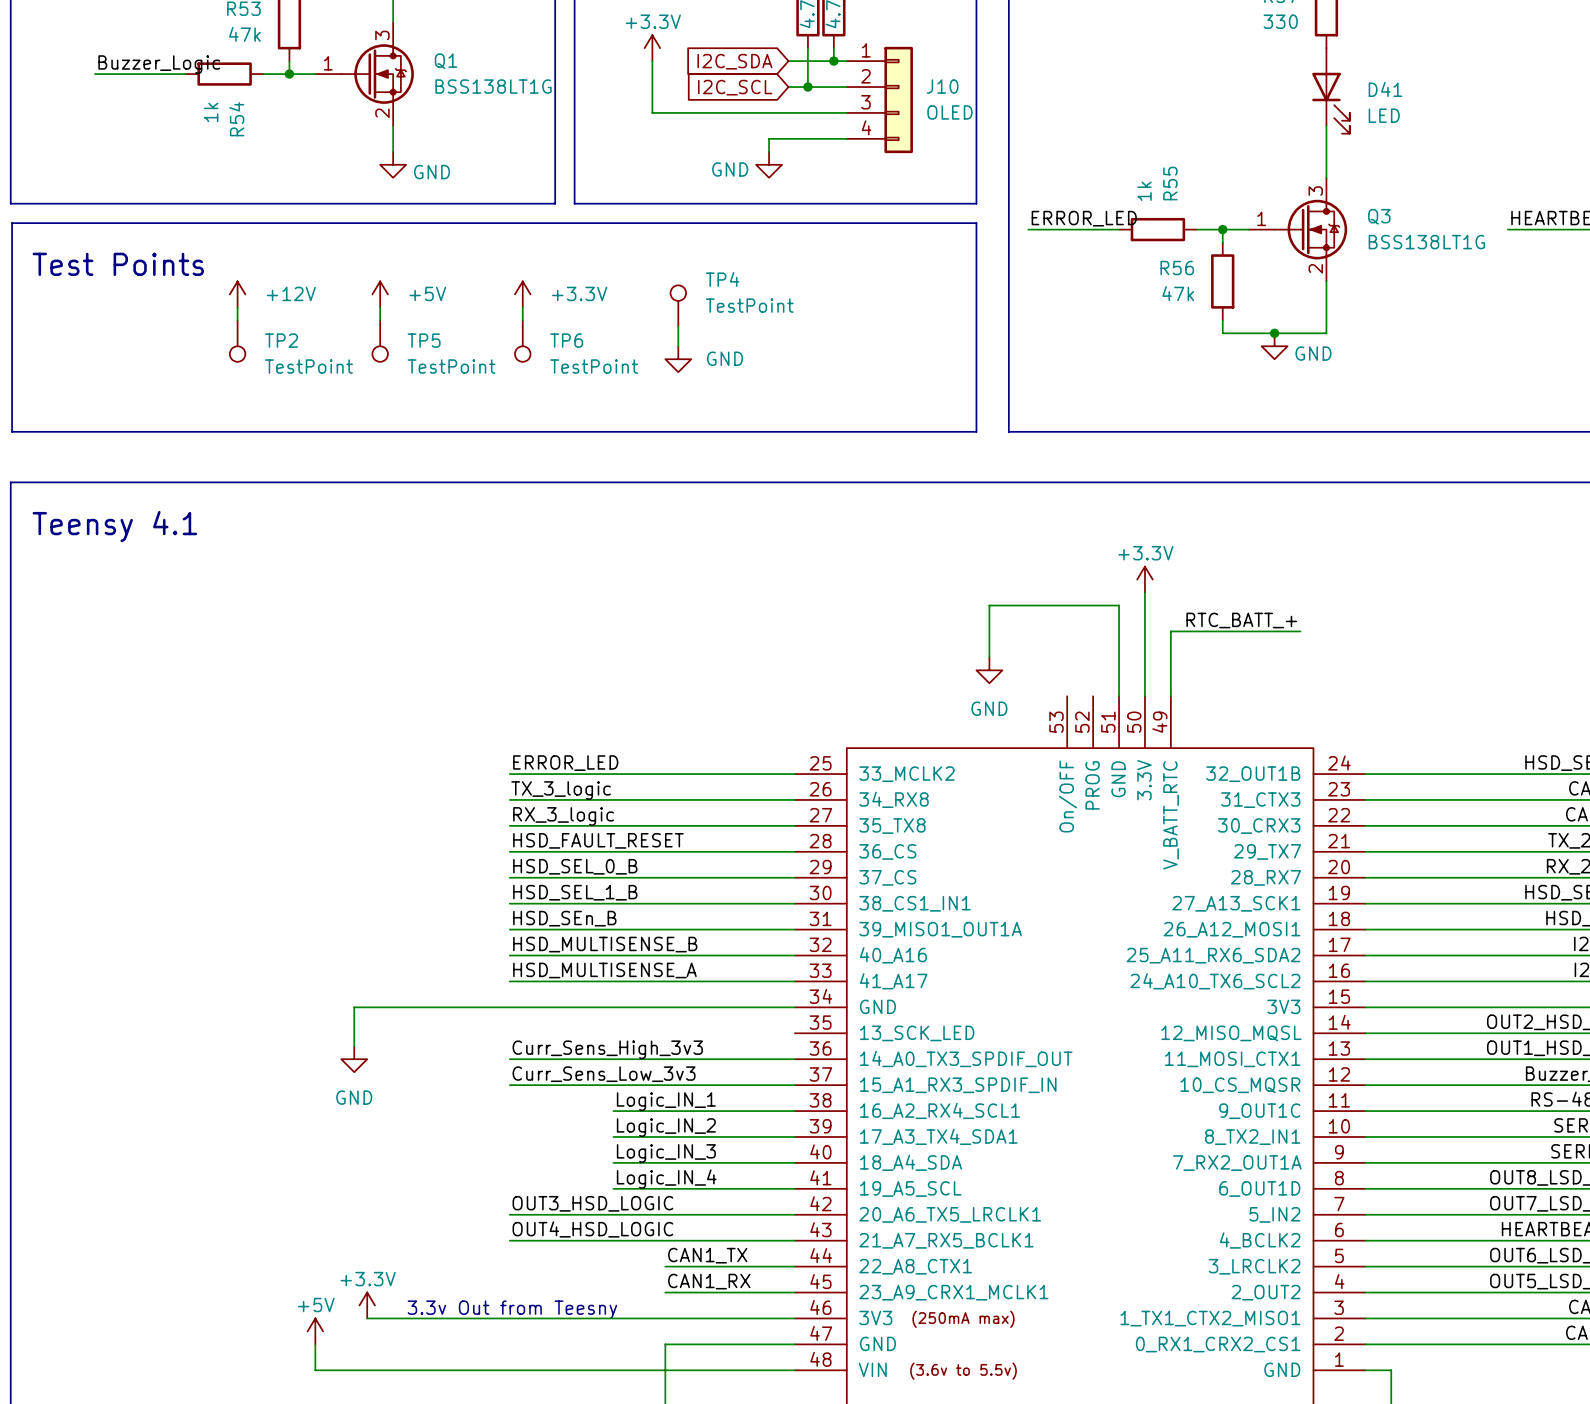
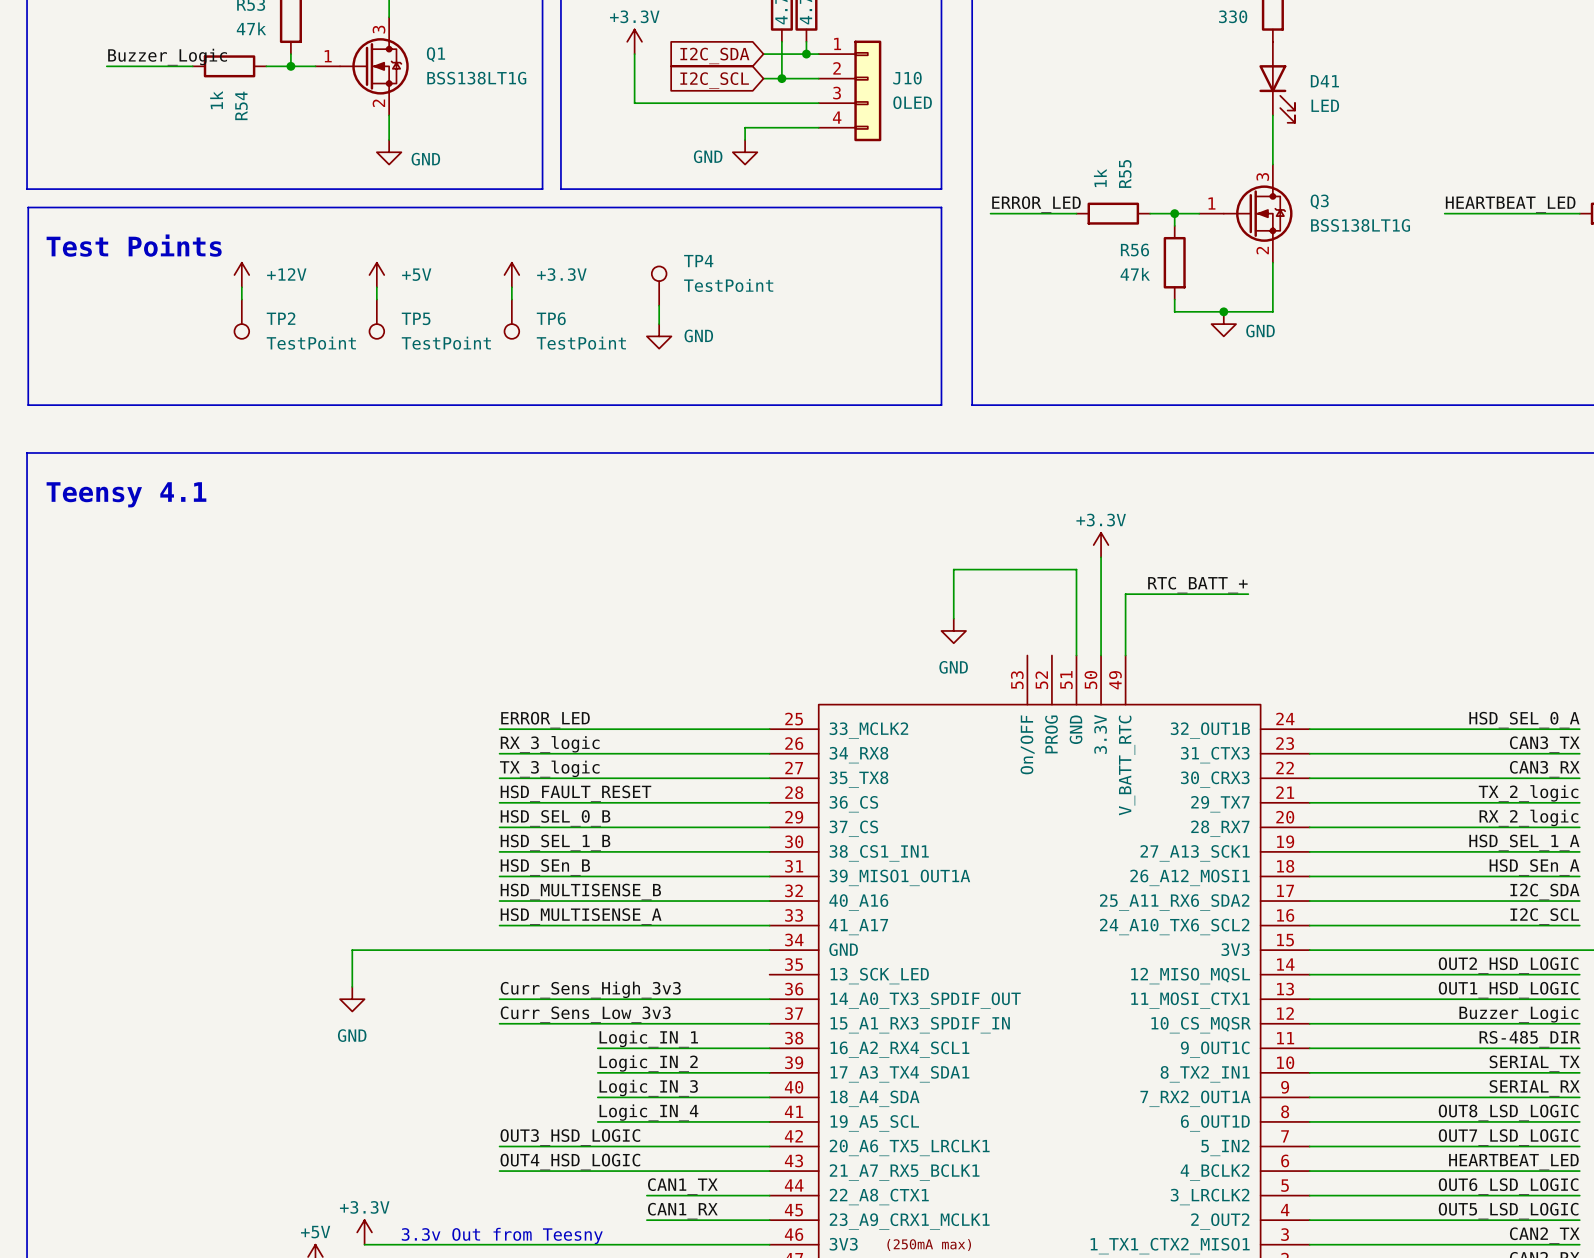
label: TX_3_logic (561, 790) -> RX_3_logic (550, 744)
label: RX_3_logic (563, 816) -> TX_3_logic (549, 768)

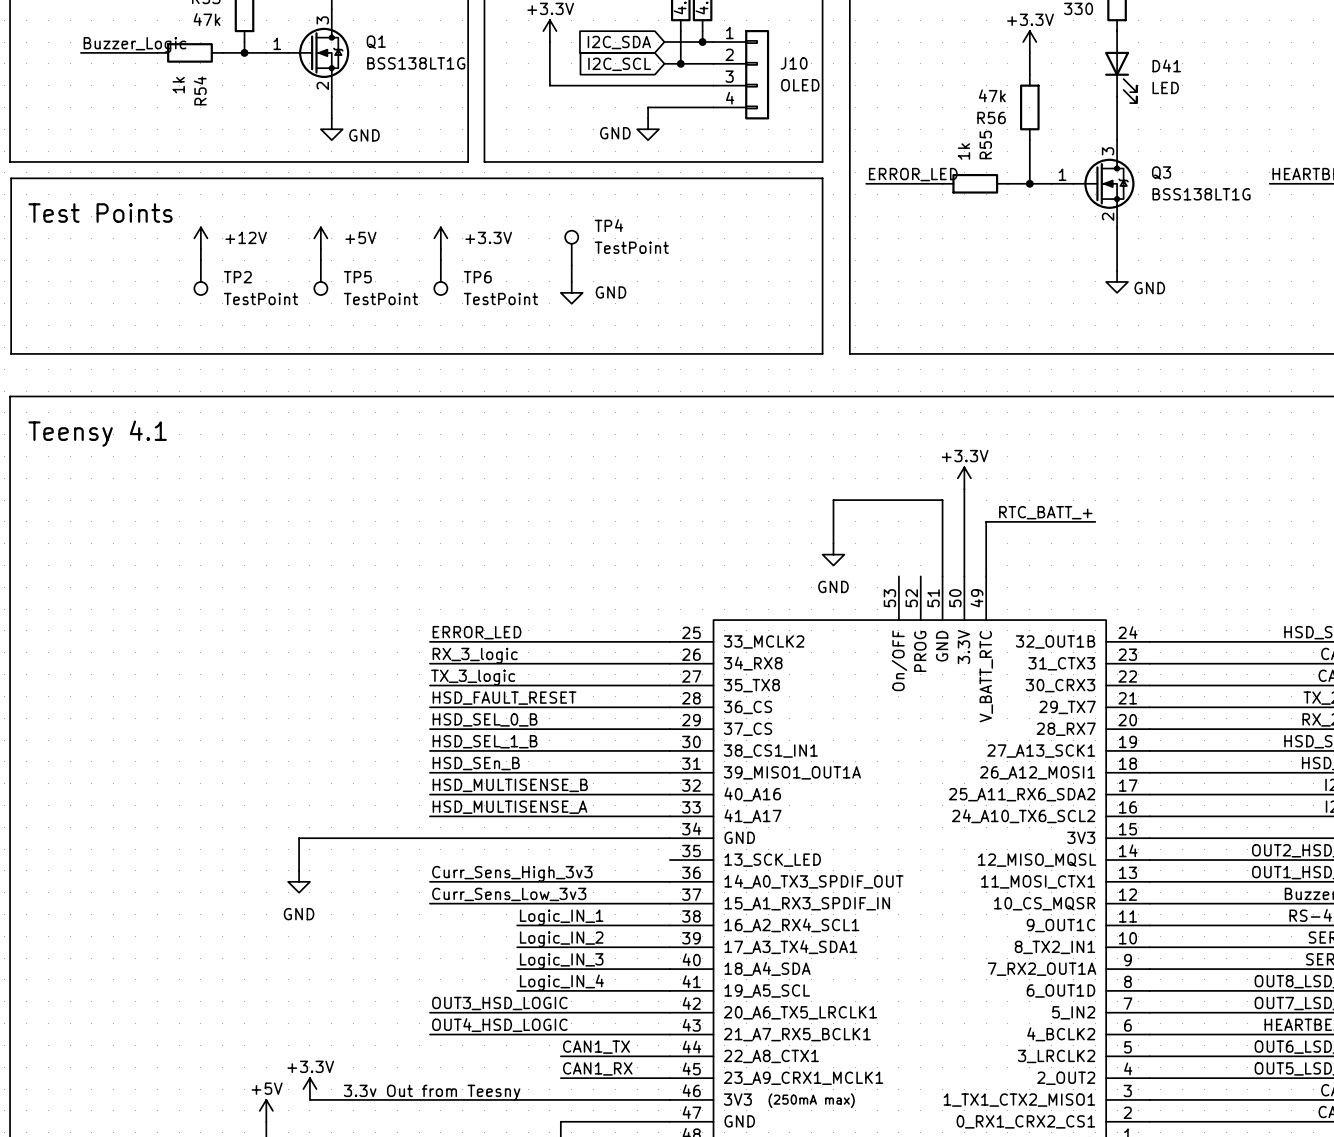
power symbol: none -> +3.3V (1029, 42)
wire: none -> (1029, 52) (1029, 74)
wire: (1174, 213) (1174, 225) -> (1029, 183) (1029, 140)
R56 name position: R56 (1134, 250) -> R56 (991, 117)
R56 position: (1174, 262) -> (1029, 107)
R56 value position: 47k (1135, 274) -> 47k (992, 95)
wire: (1174, 299) (1174, 311) (1272, 311) -> none
junction: (1223, 311) -> none
power symbol position: GND (1223, 324) -> GND (1117, 281)

